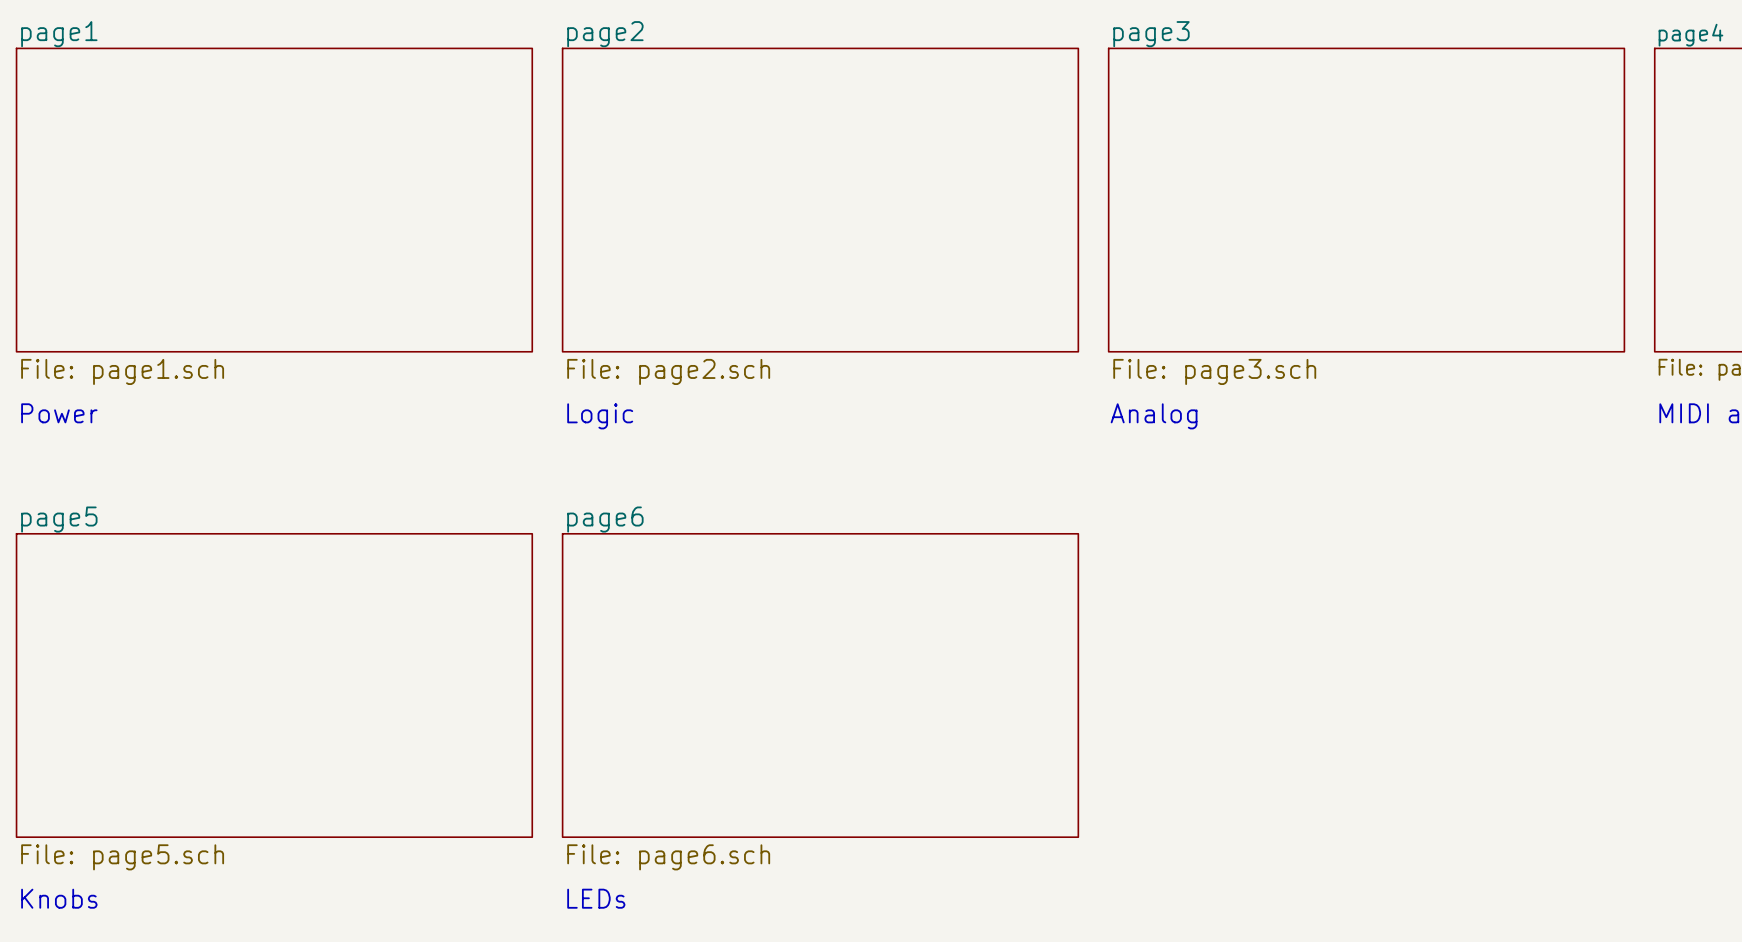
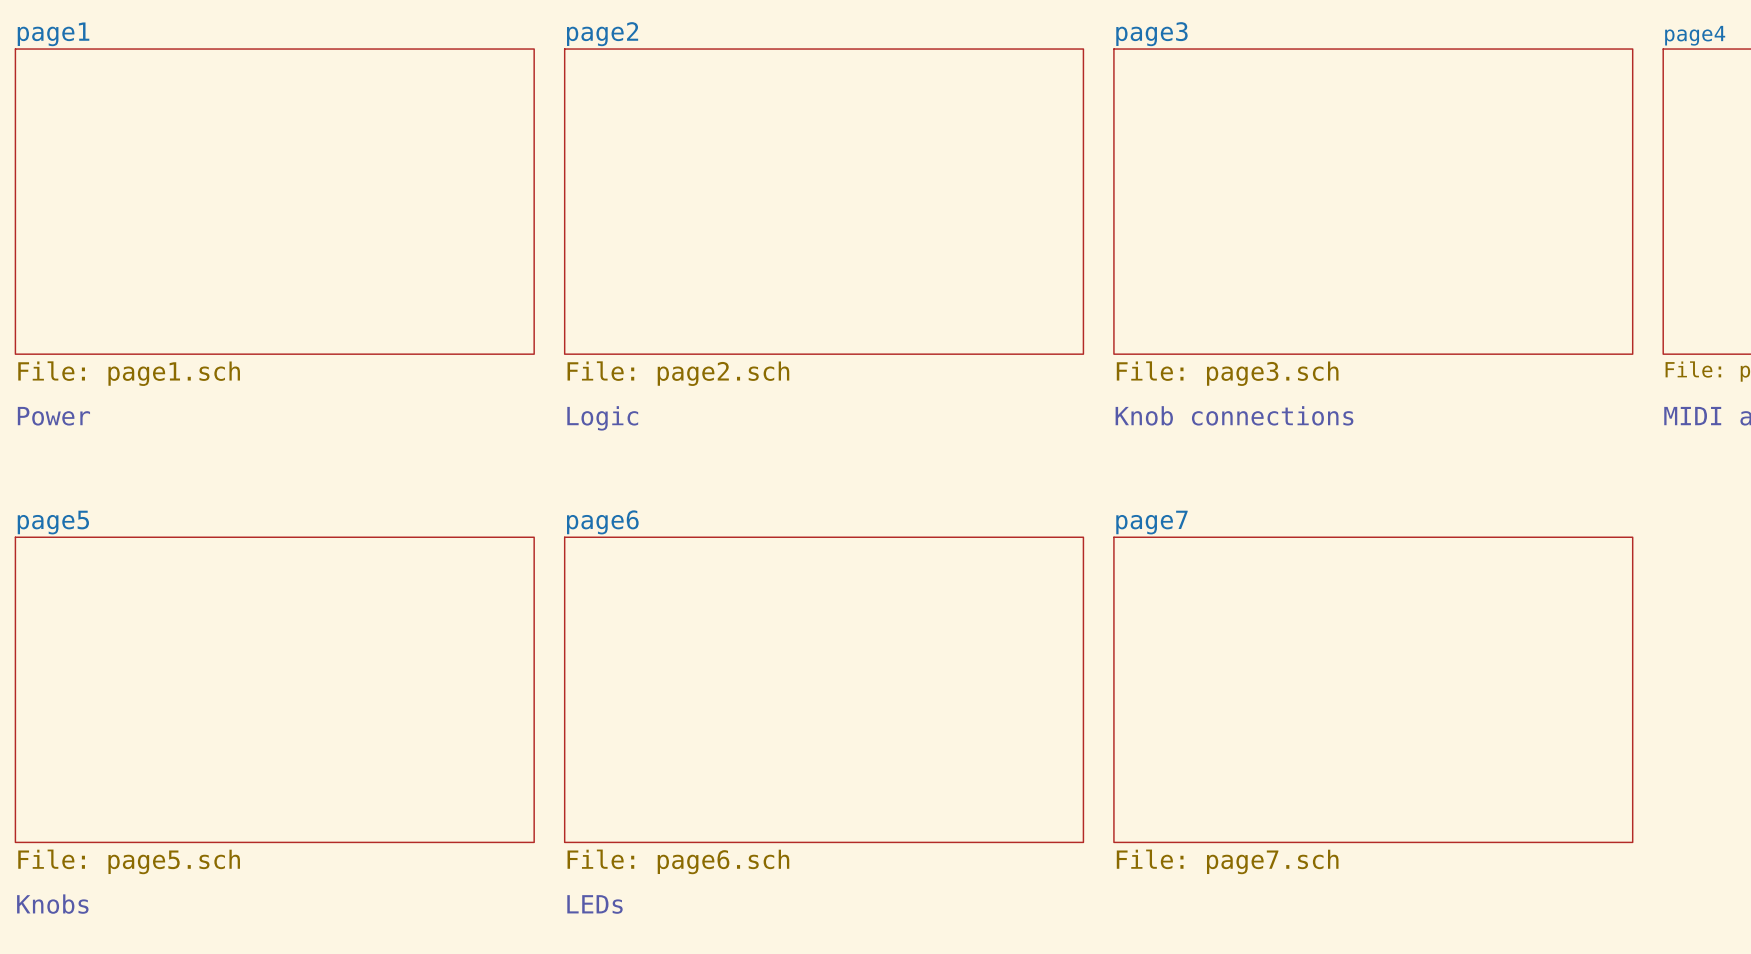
text: Analog (1154, 416) -> Knob connections (1234, 415)
sheet page7: none -> File: page7.sch (1373, 689)

